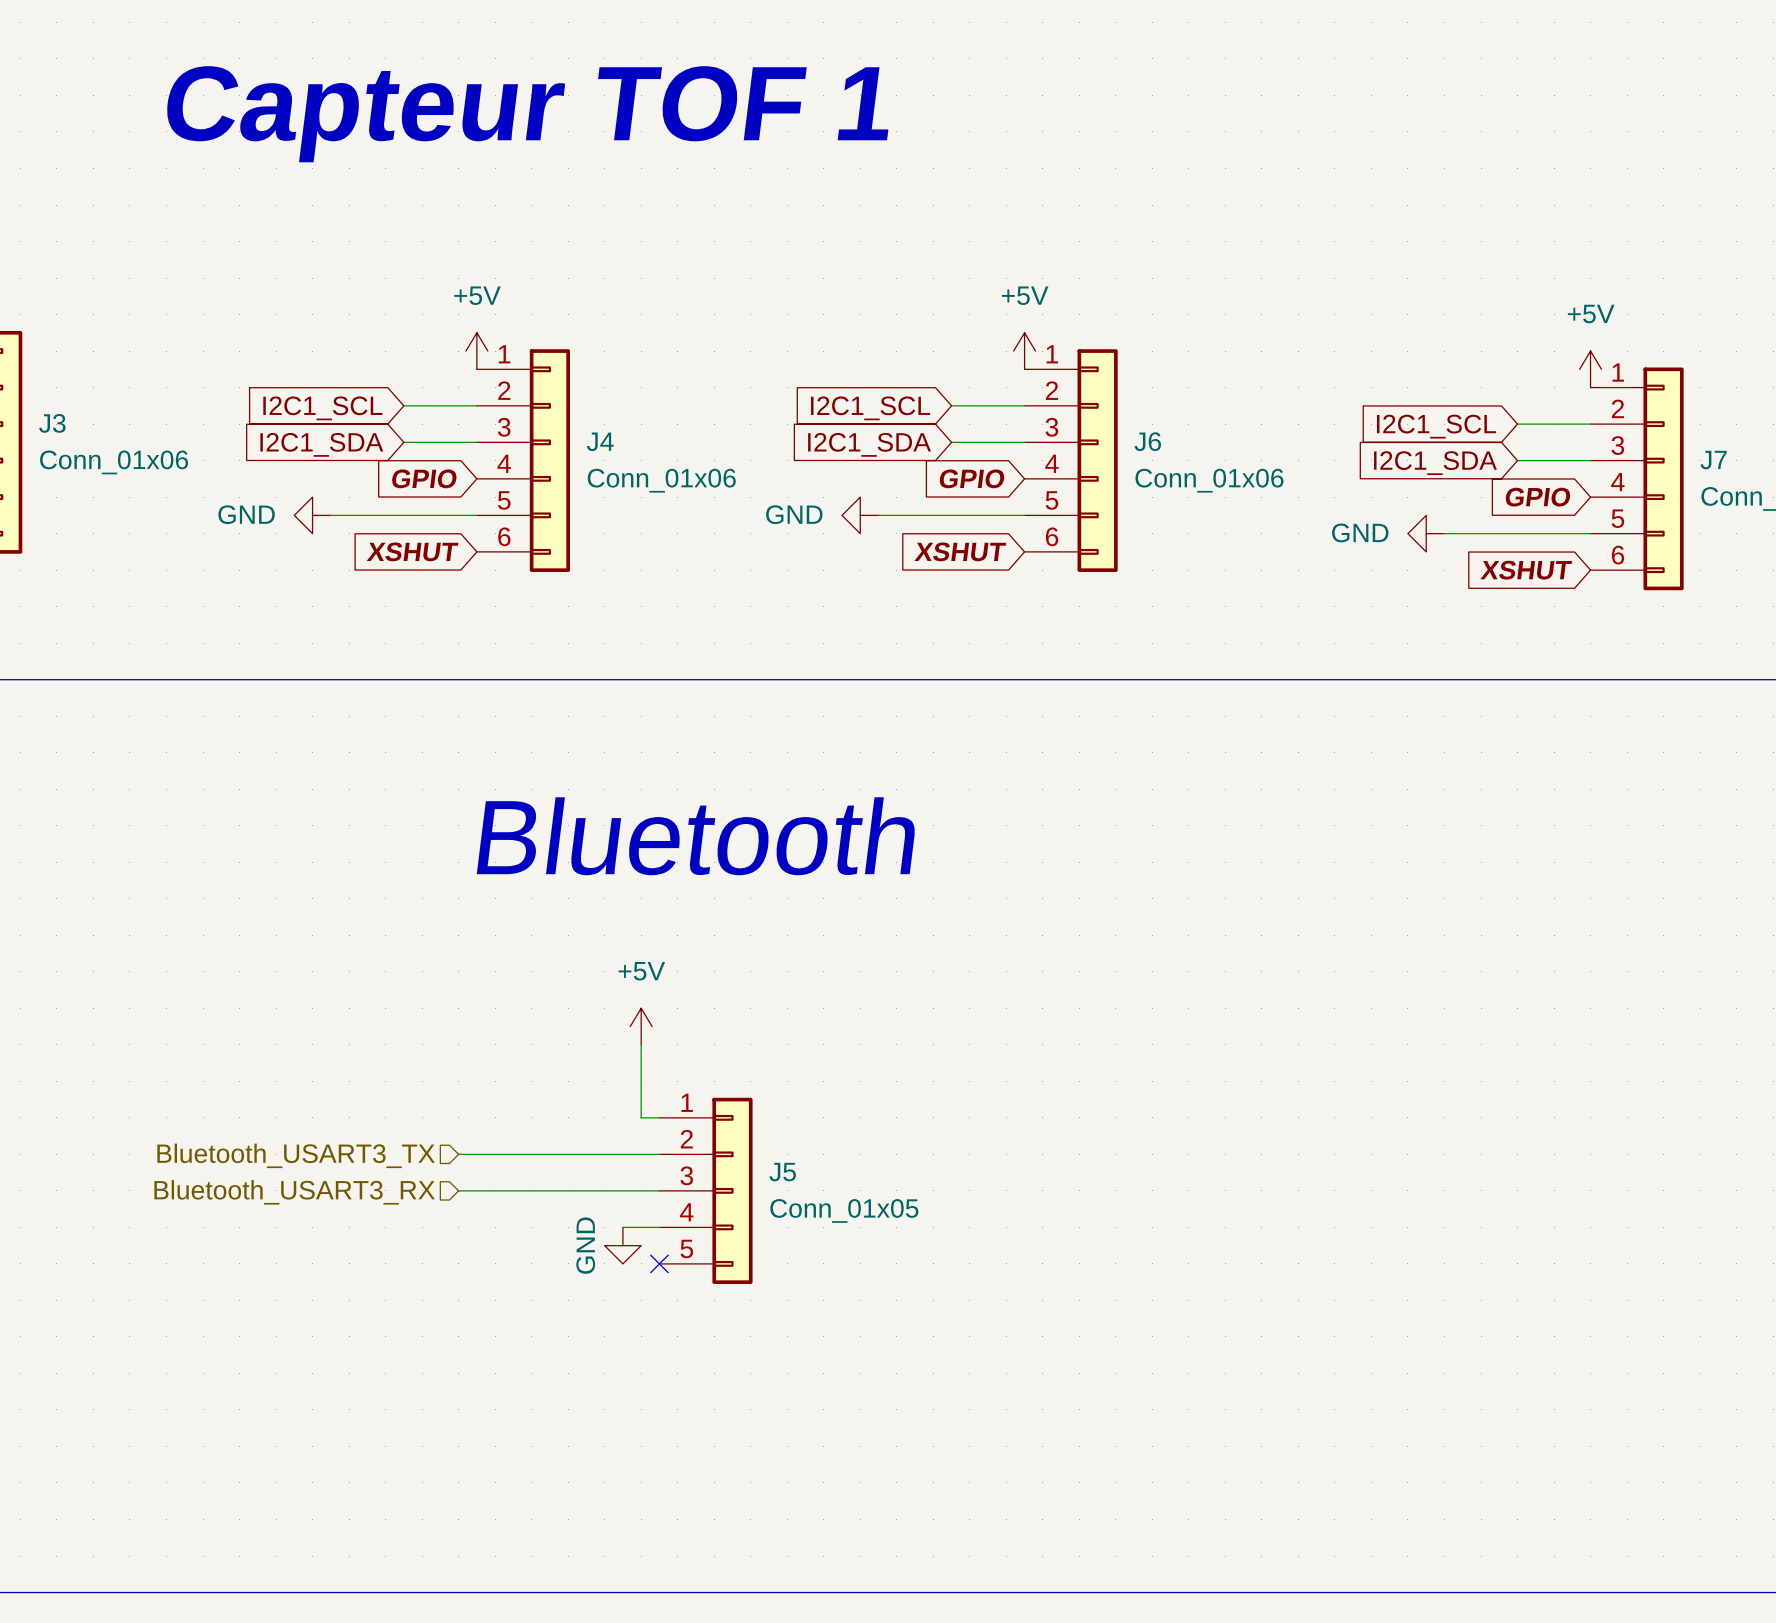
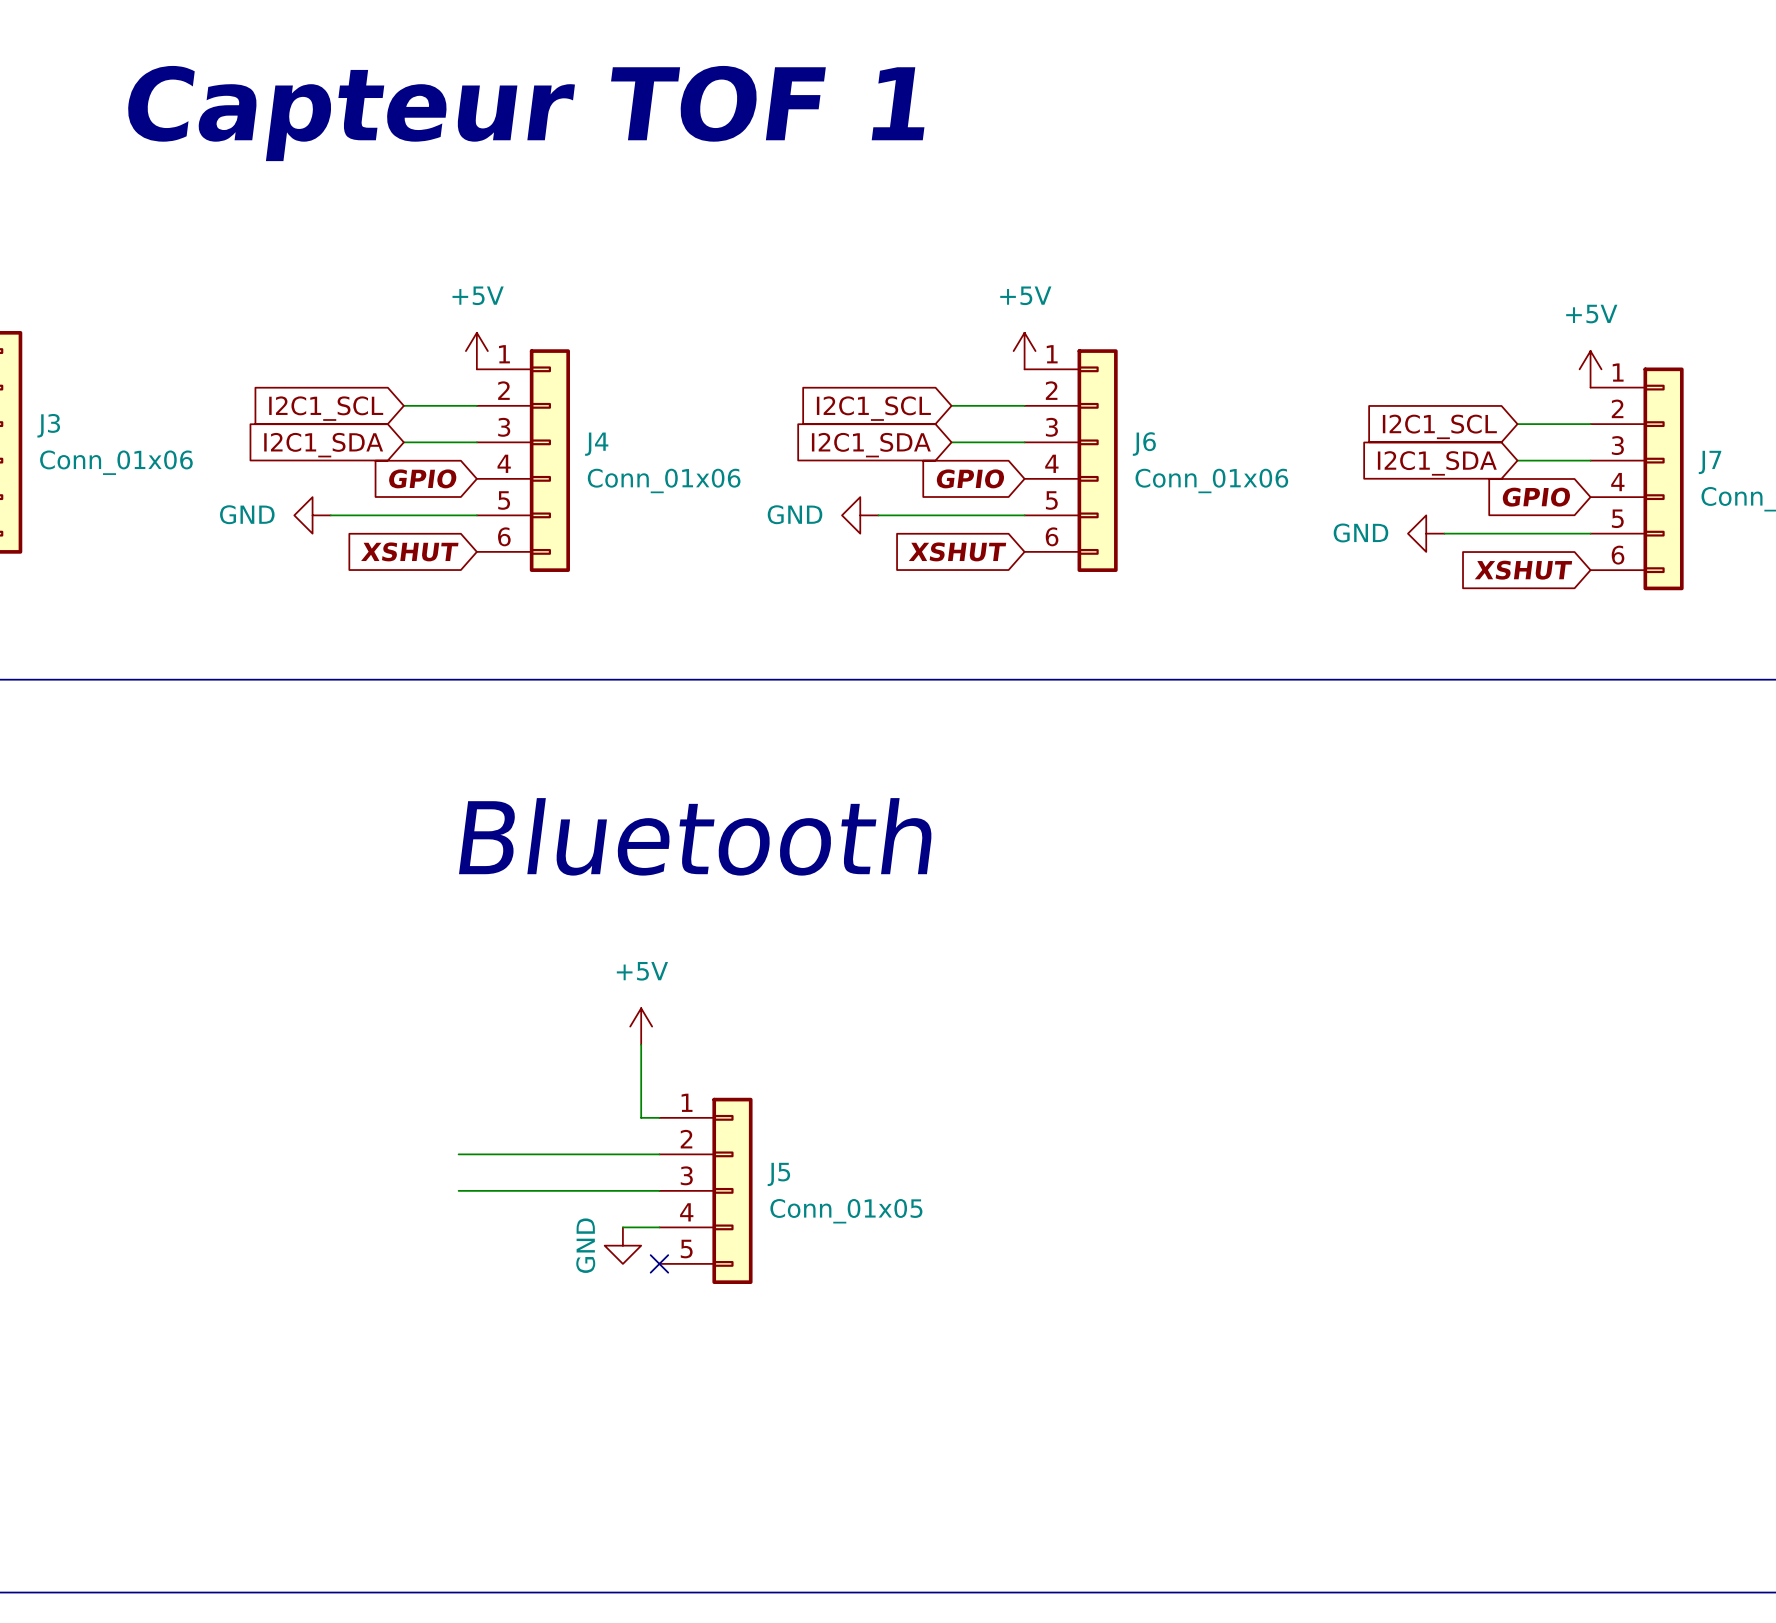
hierarchical label: Bluetooth_USART3_TX (296, 1155) -> none
hierarchical label: Bluetooth_USART3_RX (294, 1192) -> none

